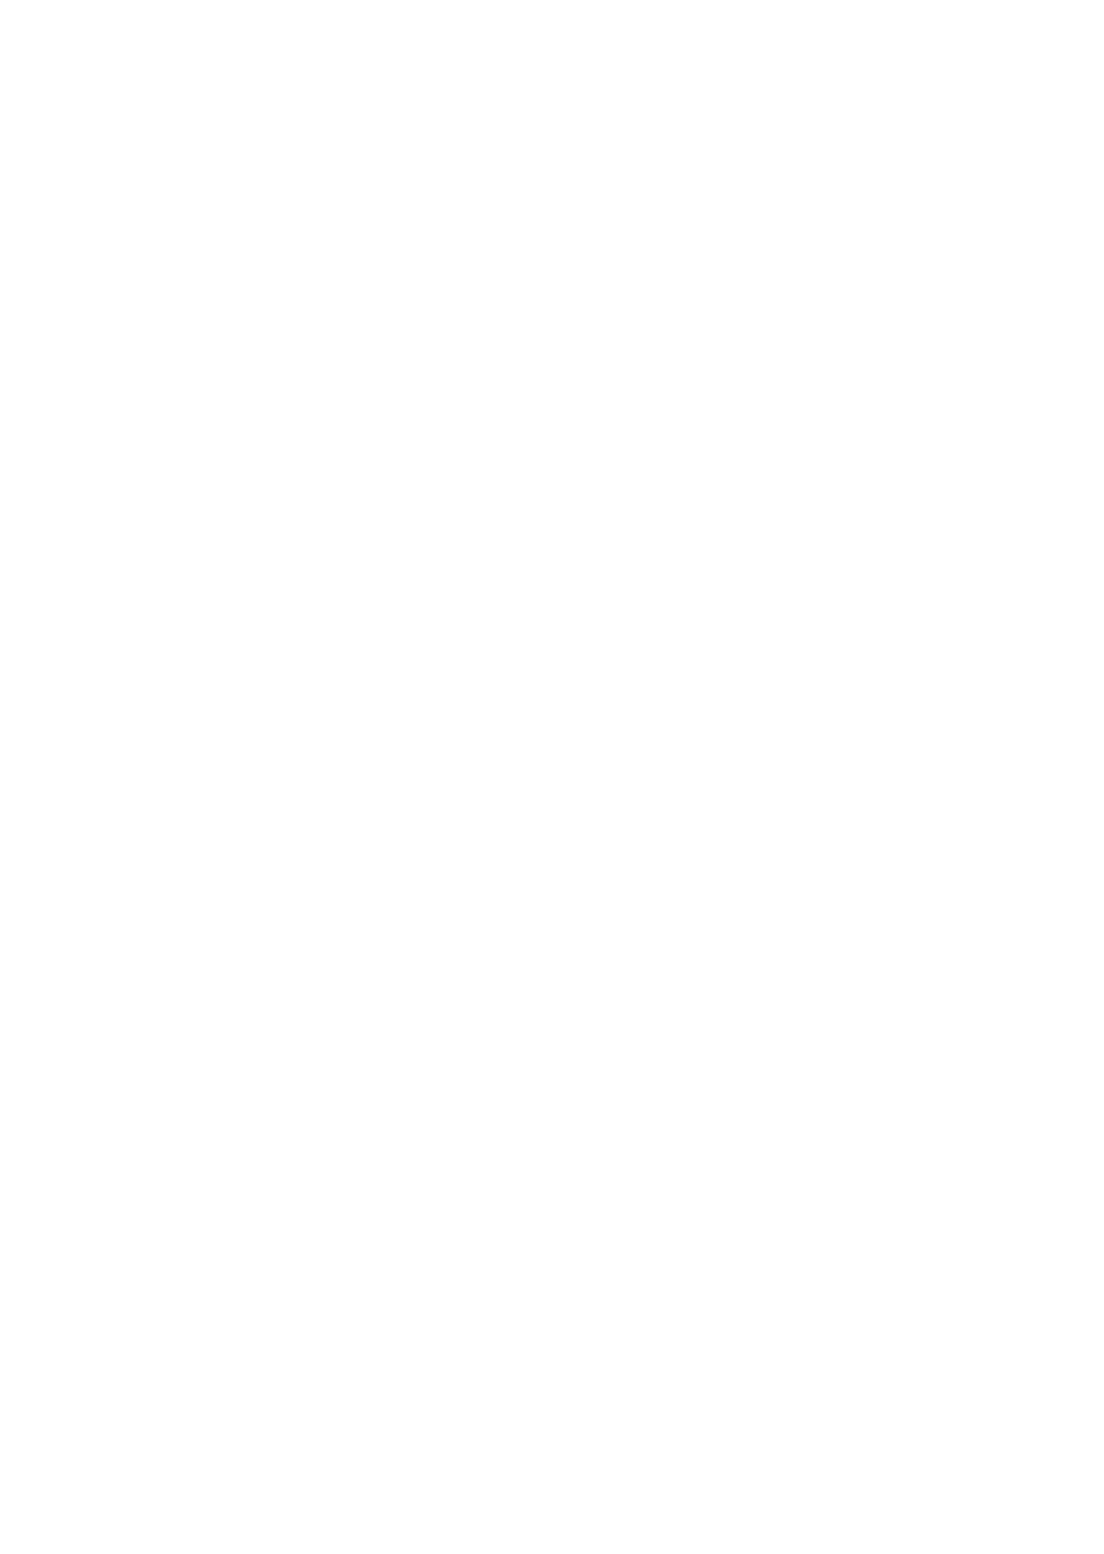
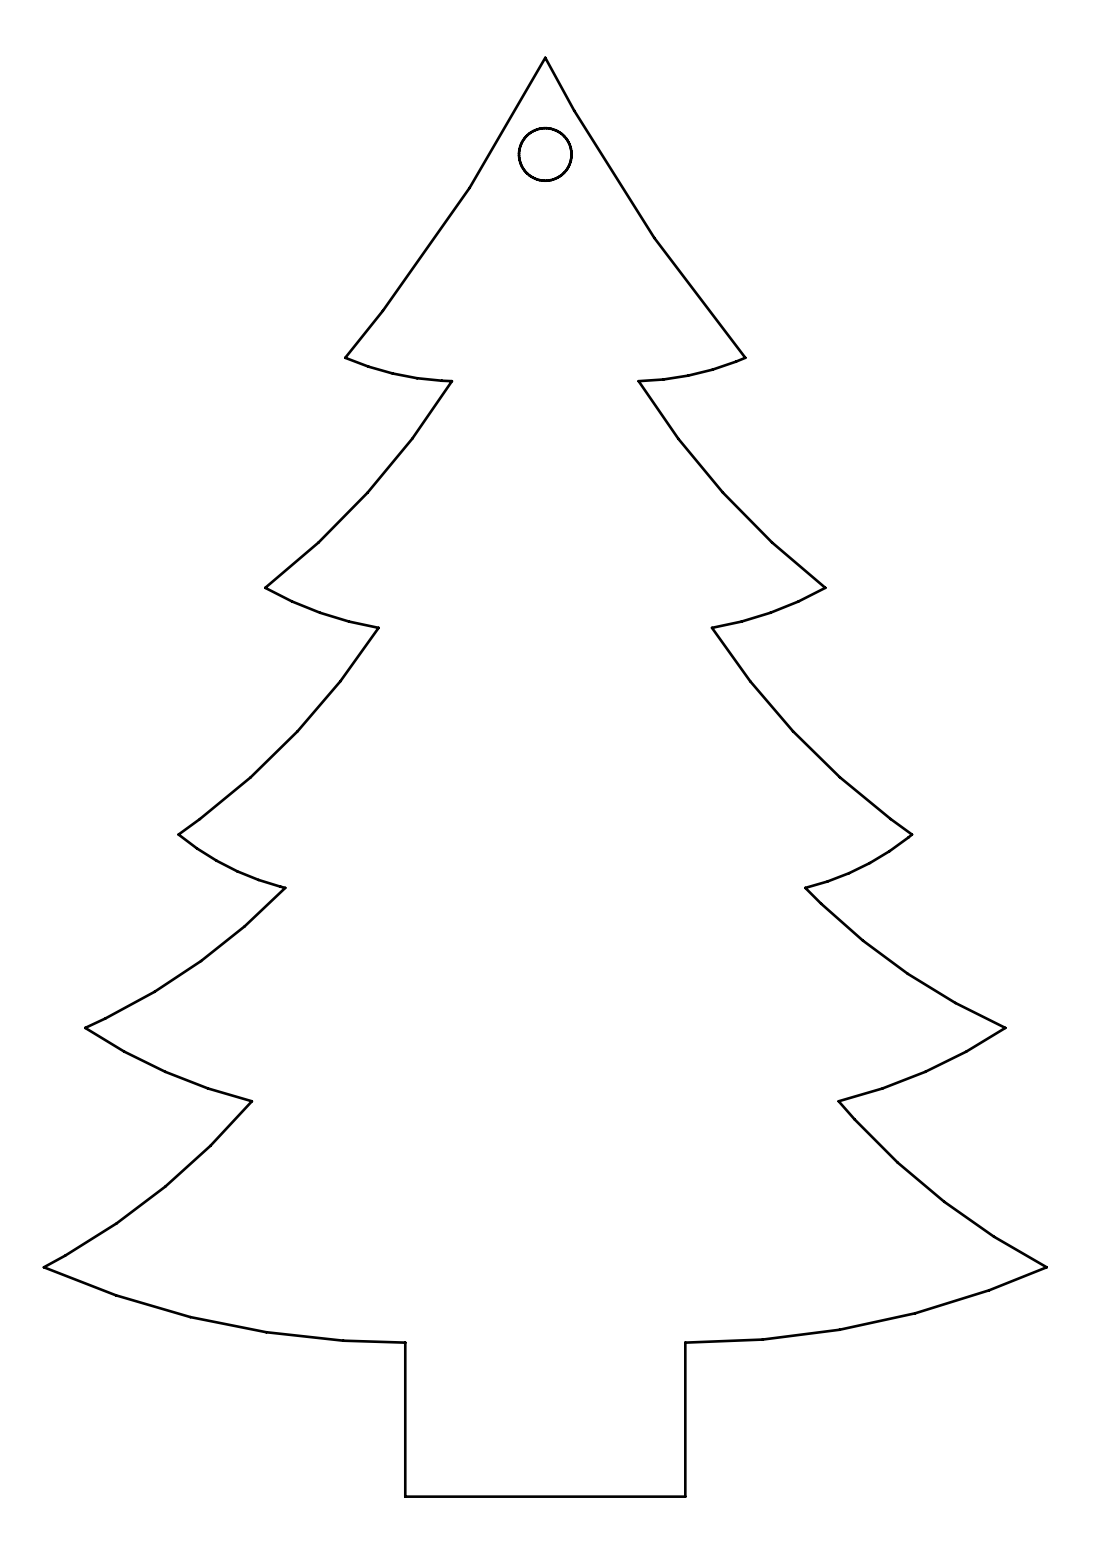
board edge: none -> (545, 57) (469, 187) (382, 310) (345, 357) (392, 373) (417, 378) (451, 381) (412, 438) (367, 492) (318, 542) (265, 587) (320, 612) (378, 627) (340, 681) (297, 731) (250, 777) (178, 834) (197, 848) (237, 871) (285, 887) (244, 926) (201, 961) (154, 991) (85, 1027) (124, 1051) (165, 1071) (207, 1088) (251, 1101) (210, 1145) (165, 1186) (116, 1223) (43, 1267) (116, 1295) (190, 1317) (266, 1332) (343, 1340) (405, 1342) (405, 1496) (685, 1496) (685, 1342) (762, 1339) (839, 1329) (915, 1313) (989, 1290) (1046, 1267) (994, 1236) (944, 1201) (897, 1162) (838, 1101) (882, 1088) (925, 1071) (966, 1051) (1005, 1027) (955, 1002) (907, 973) (862, 940) (805, 887) (827, 881) (869, 863) (912, 834) (839, 777) (793, 731) (750, 681) (711, 627) (770, 612) (825, 587) (772, 542) (722, 492) (678, 438) (638, 381) (688, 375) (712, 369) (745, 357) (654, 237) (574, 110) (545, 57)
board edge: none -> (546, 128) (537, 129) (527, 135) (521, 142) (519, 153) (521, 164) (525, 172) (535, 178) (544, 180) (553, 179) (563, 173) (569, 164) (571, 155) (569, 144) (564, 136) (557, 131) (546, 128)

